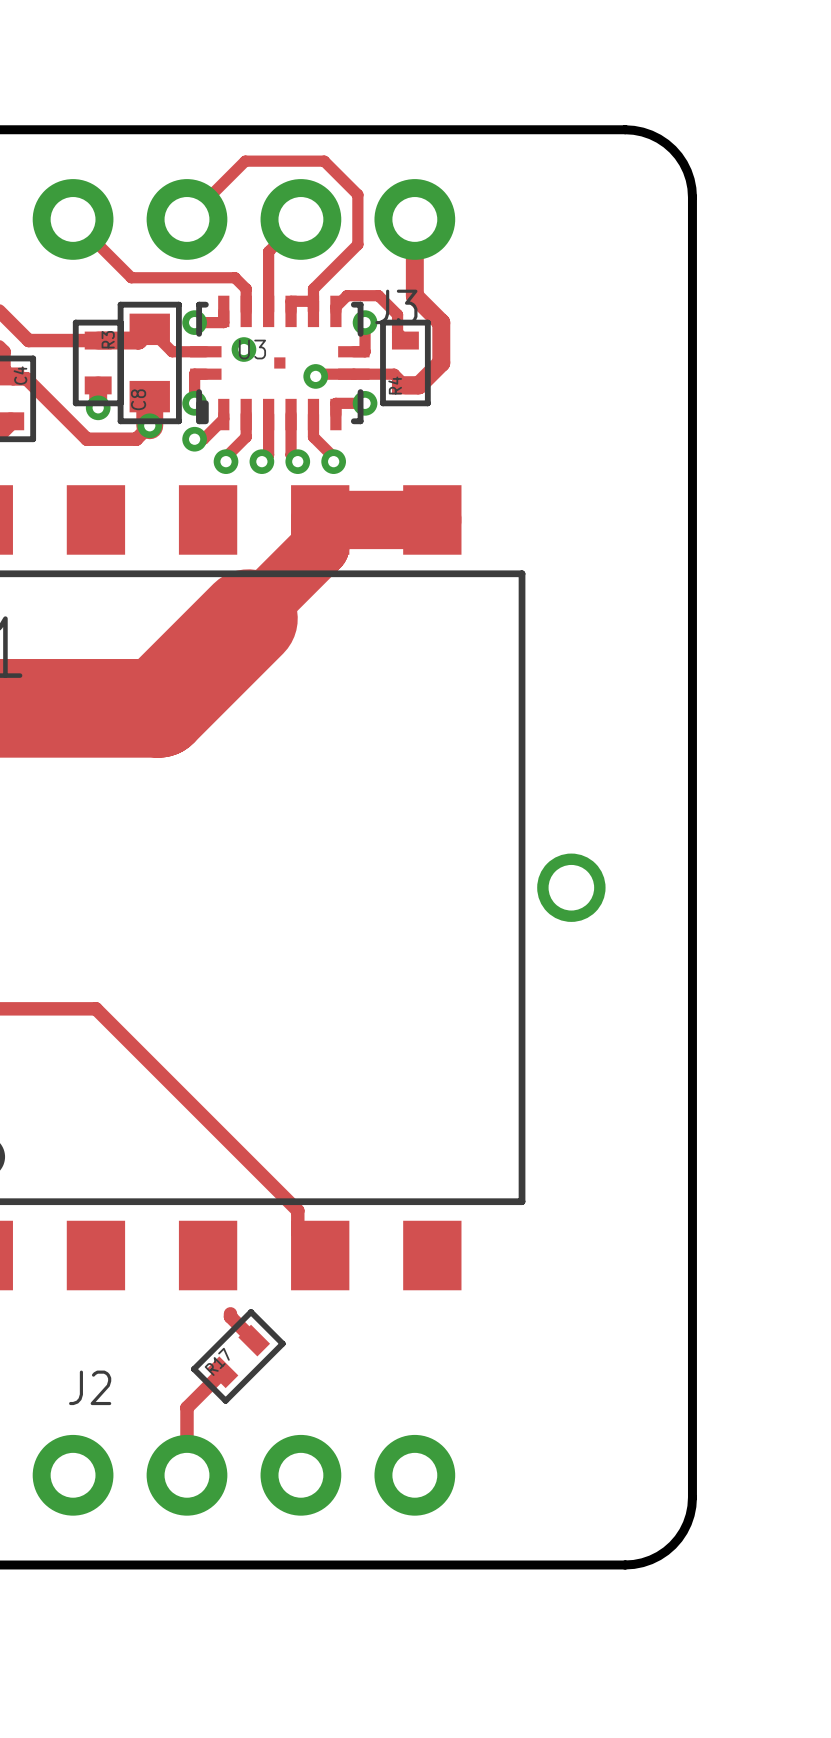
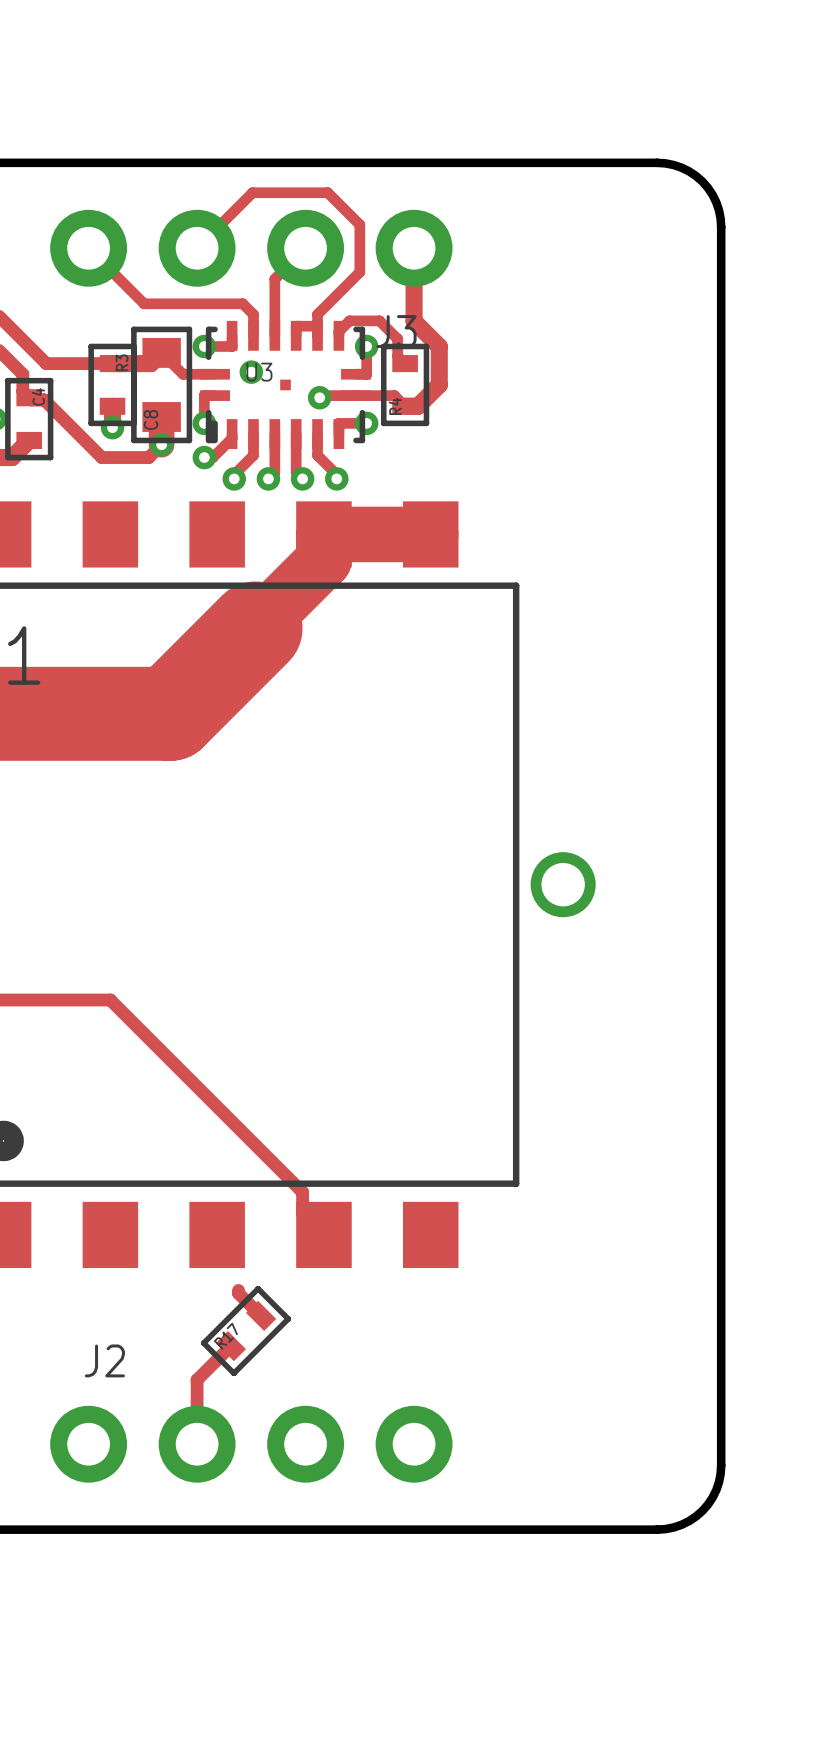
board edge: (625, 129) (650, 134) (672, 149) (687, 171) (692, 197) (692, 1497) (687, 1523) (672, 1545) (650, 1559) (625, 1564) -> (614, 162) (665, 163) (689, 171) (702, 181) (712, 194) (719, 210) (721, 226) (720, 1473) (712, 1497) (702, 1510) (689, 1521) (665, 1529) (614, 1529)

